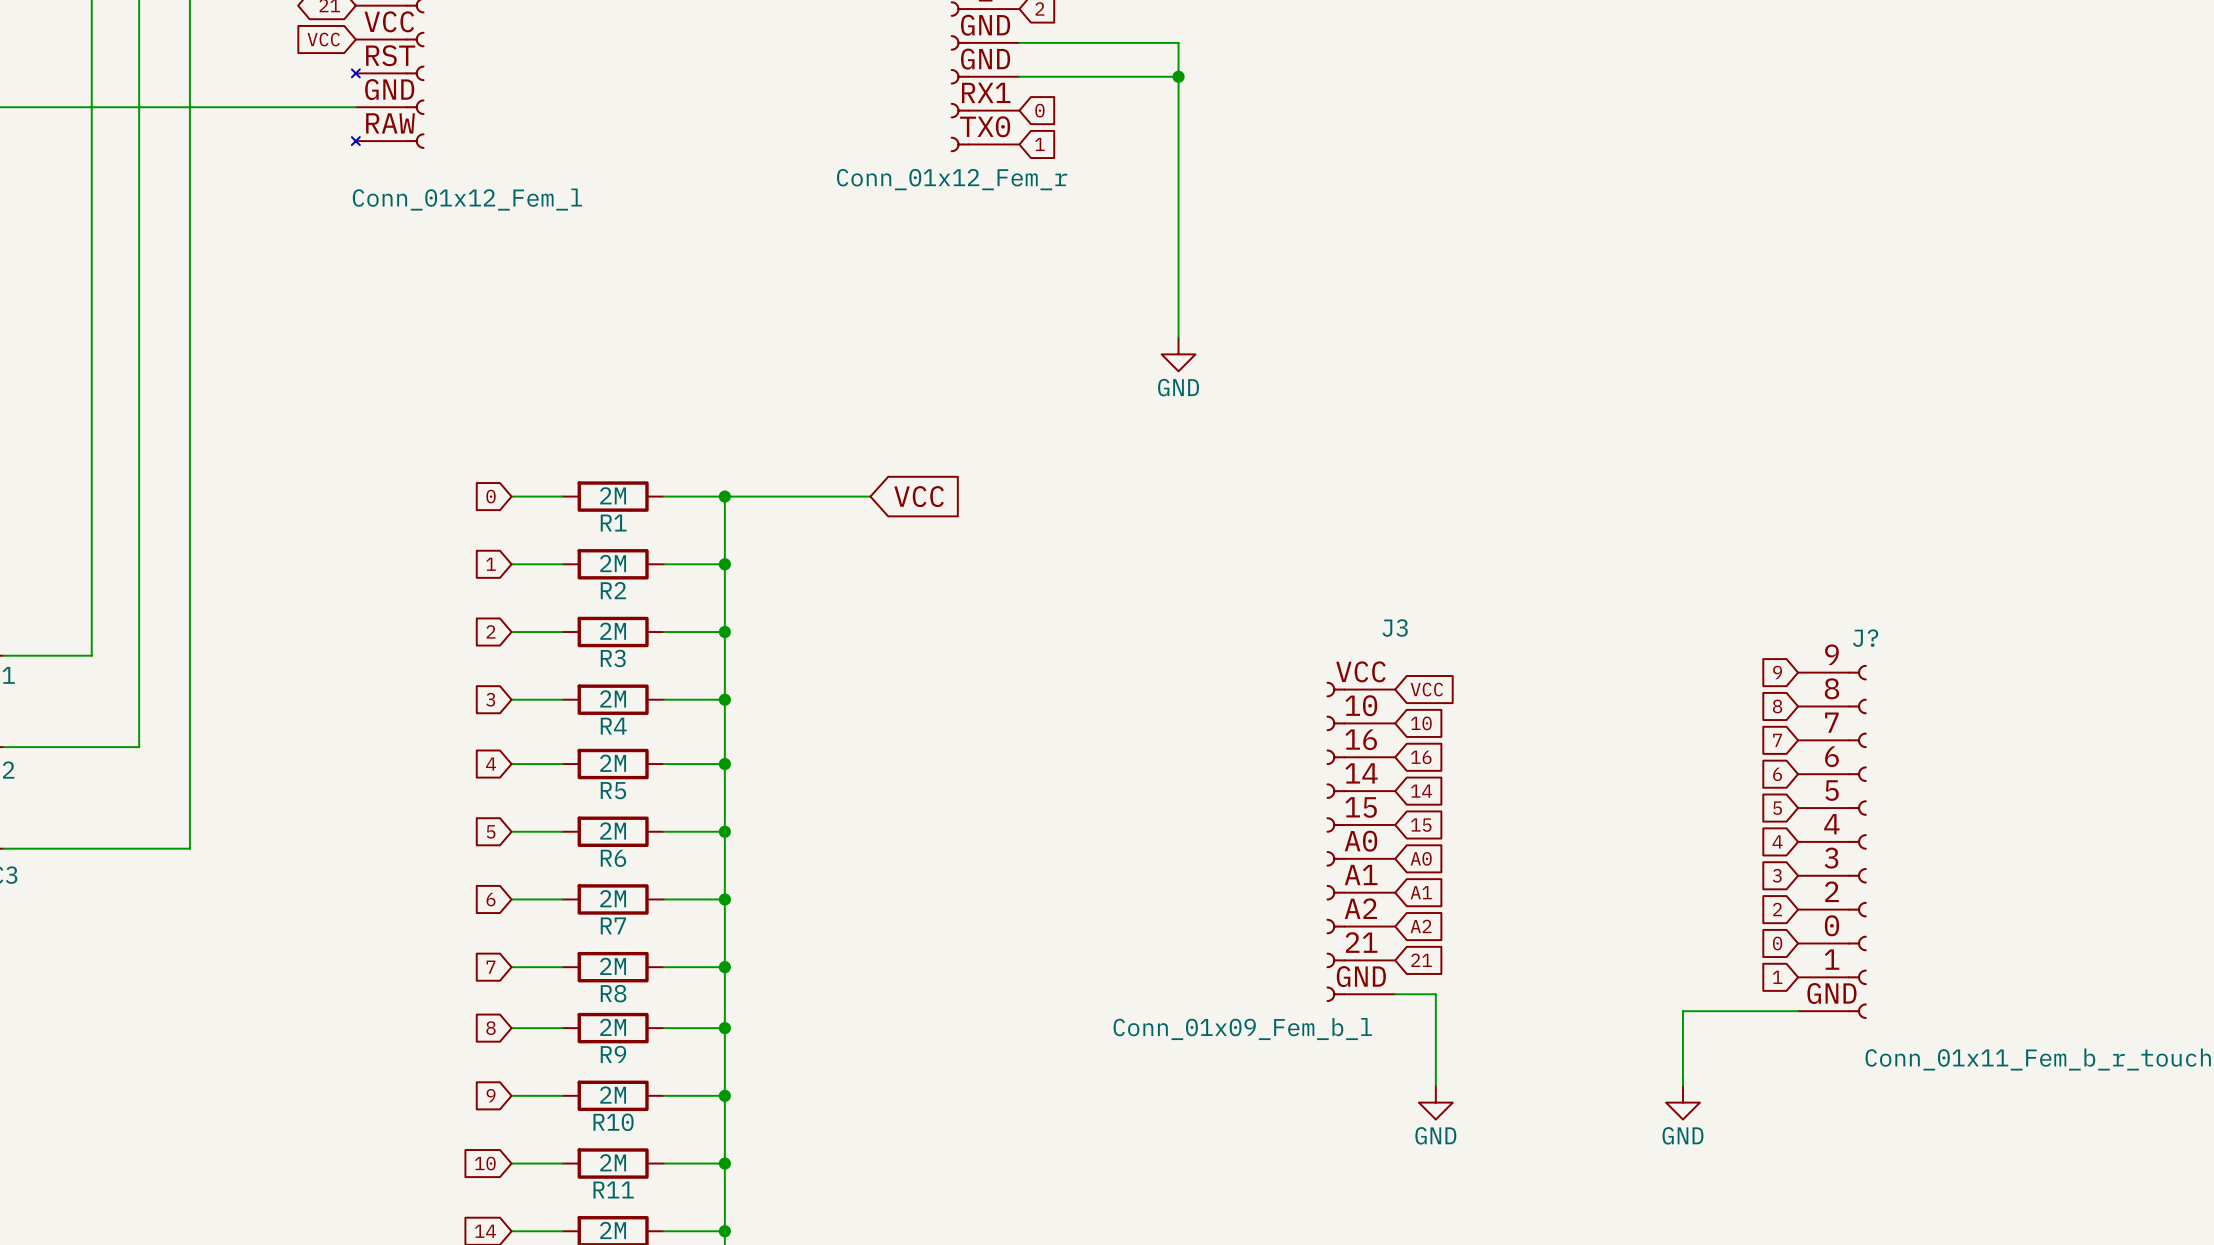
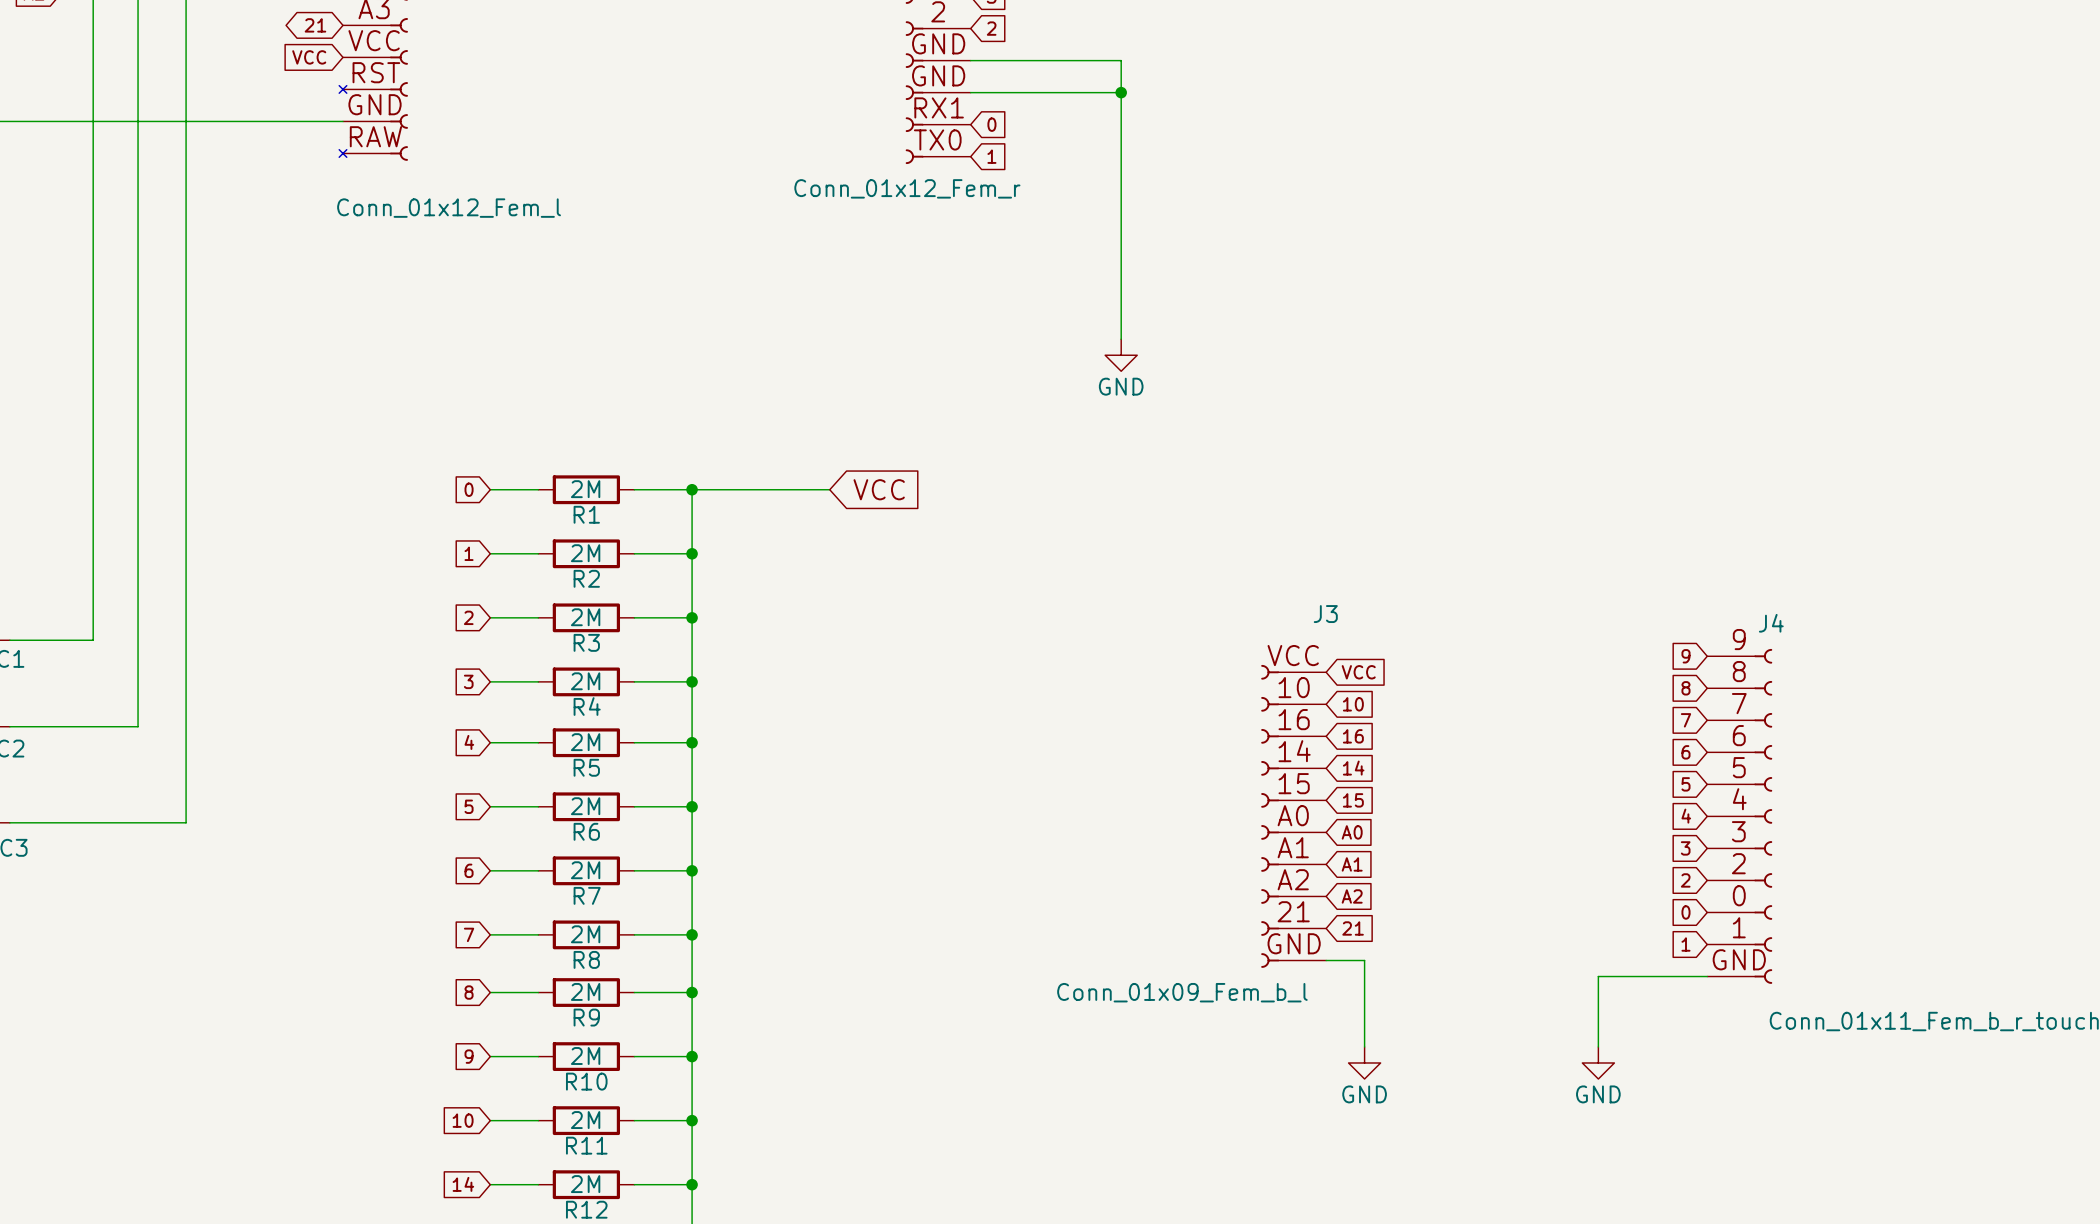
J? name: J? (1865, 638) -> J4 (1771, 623)

